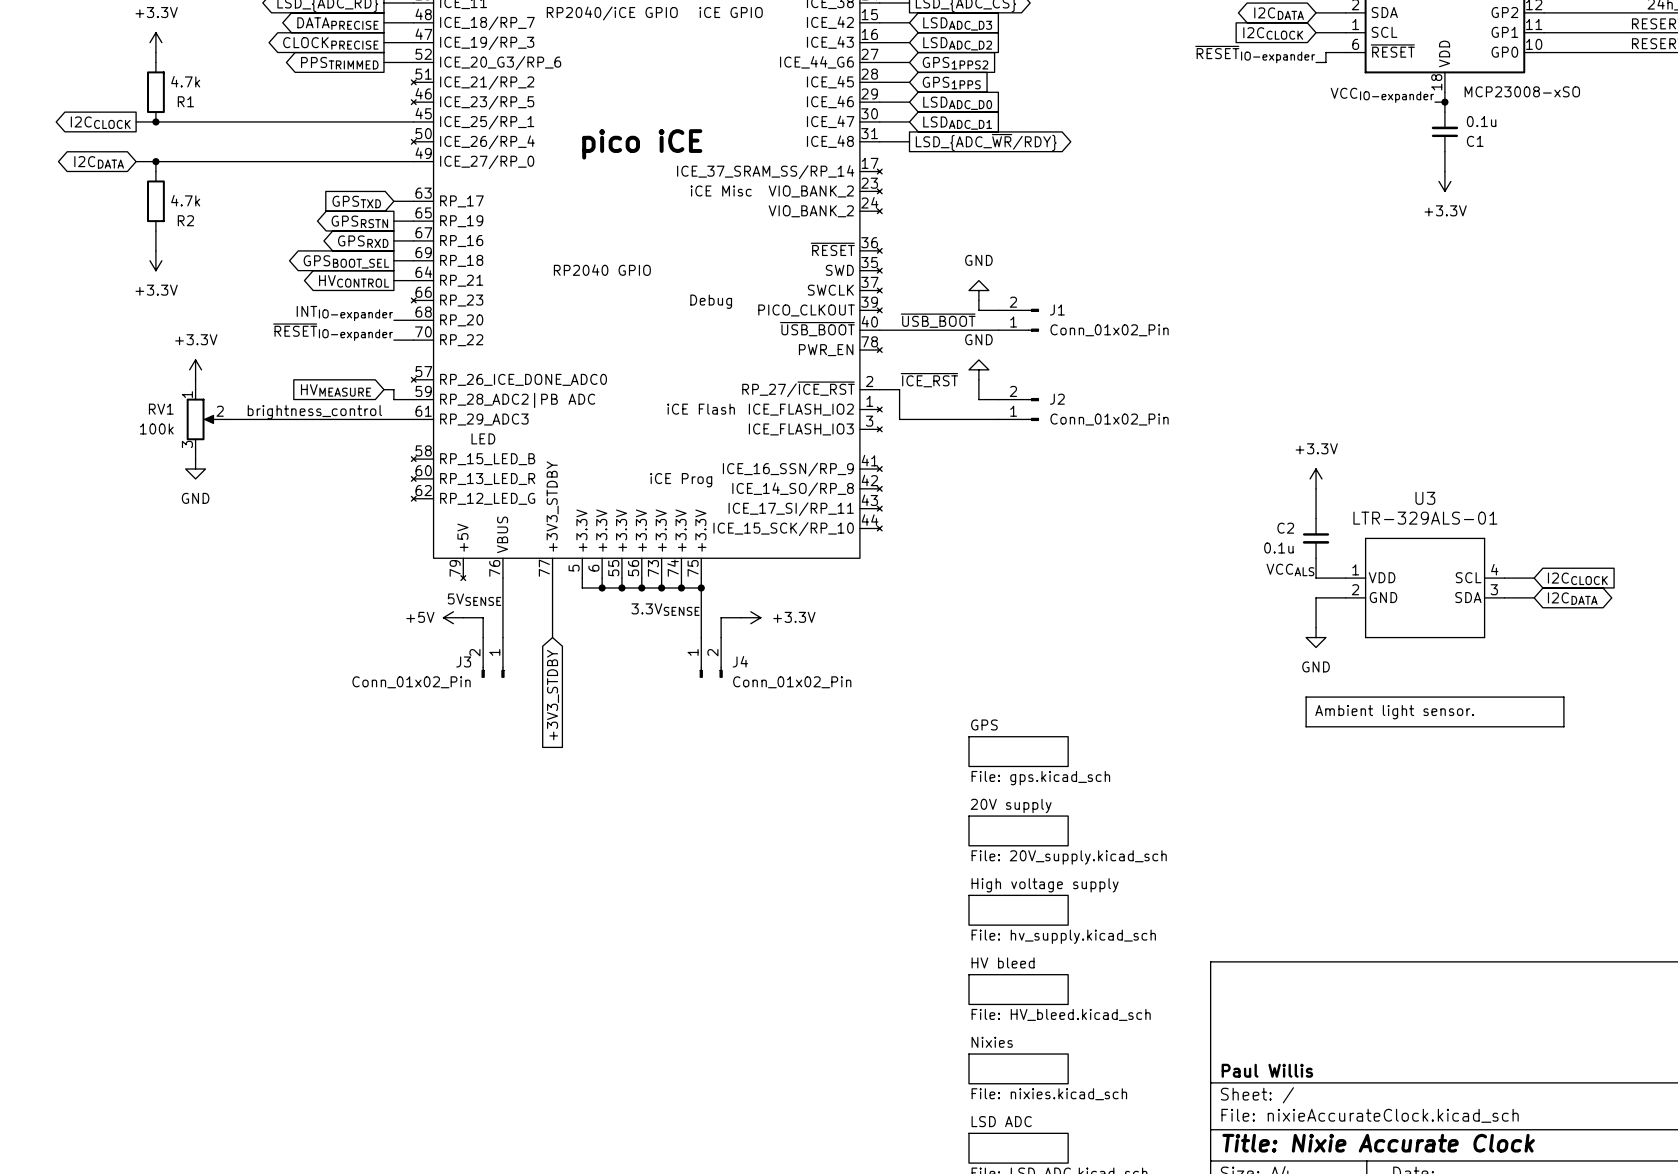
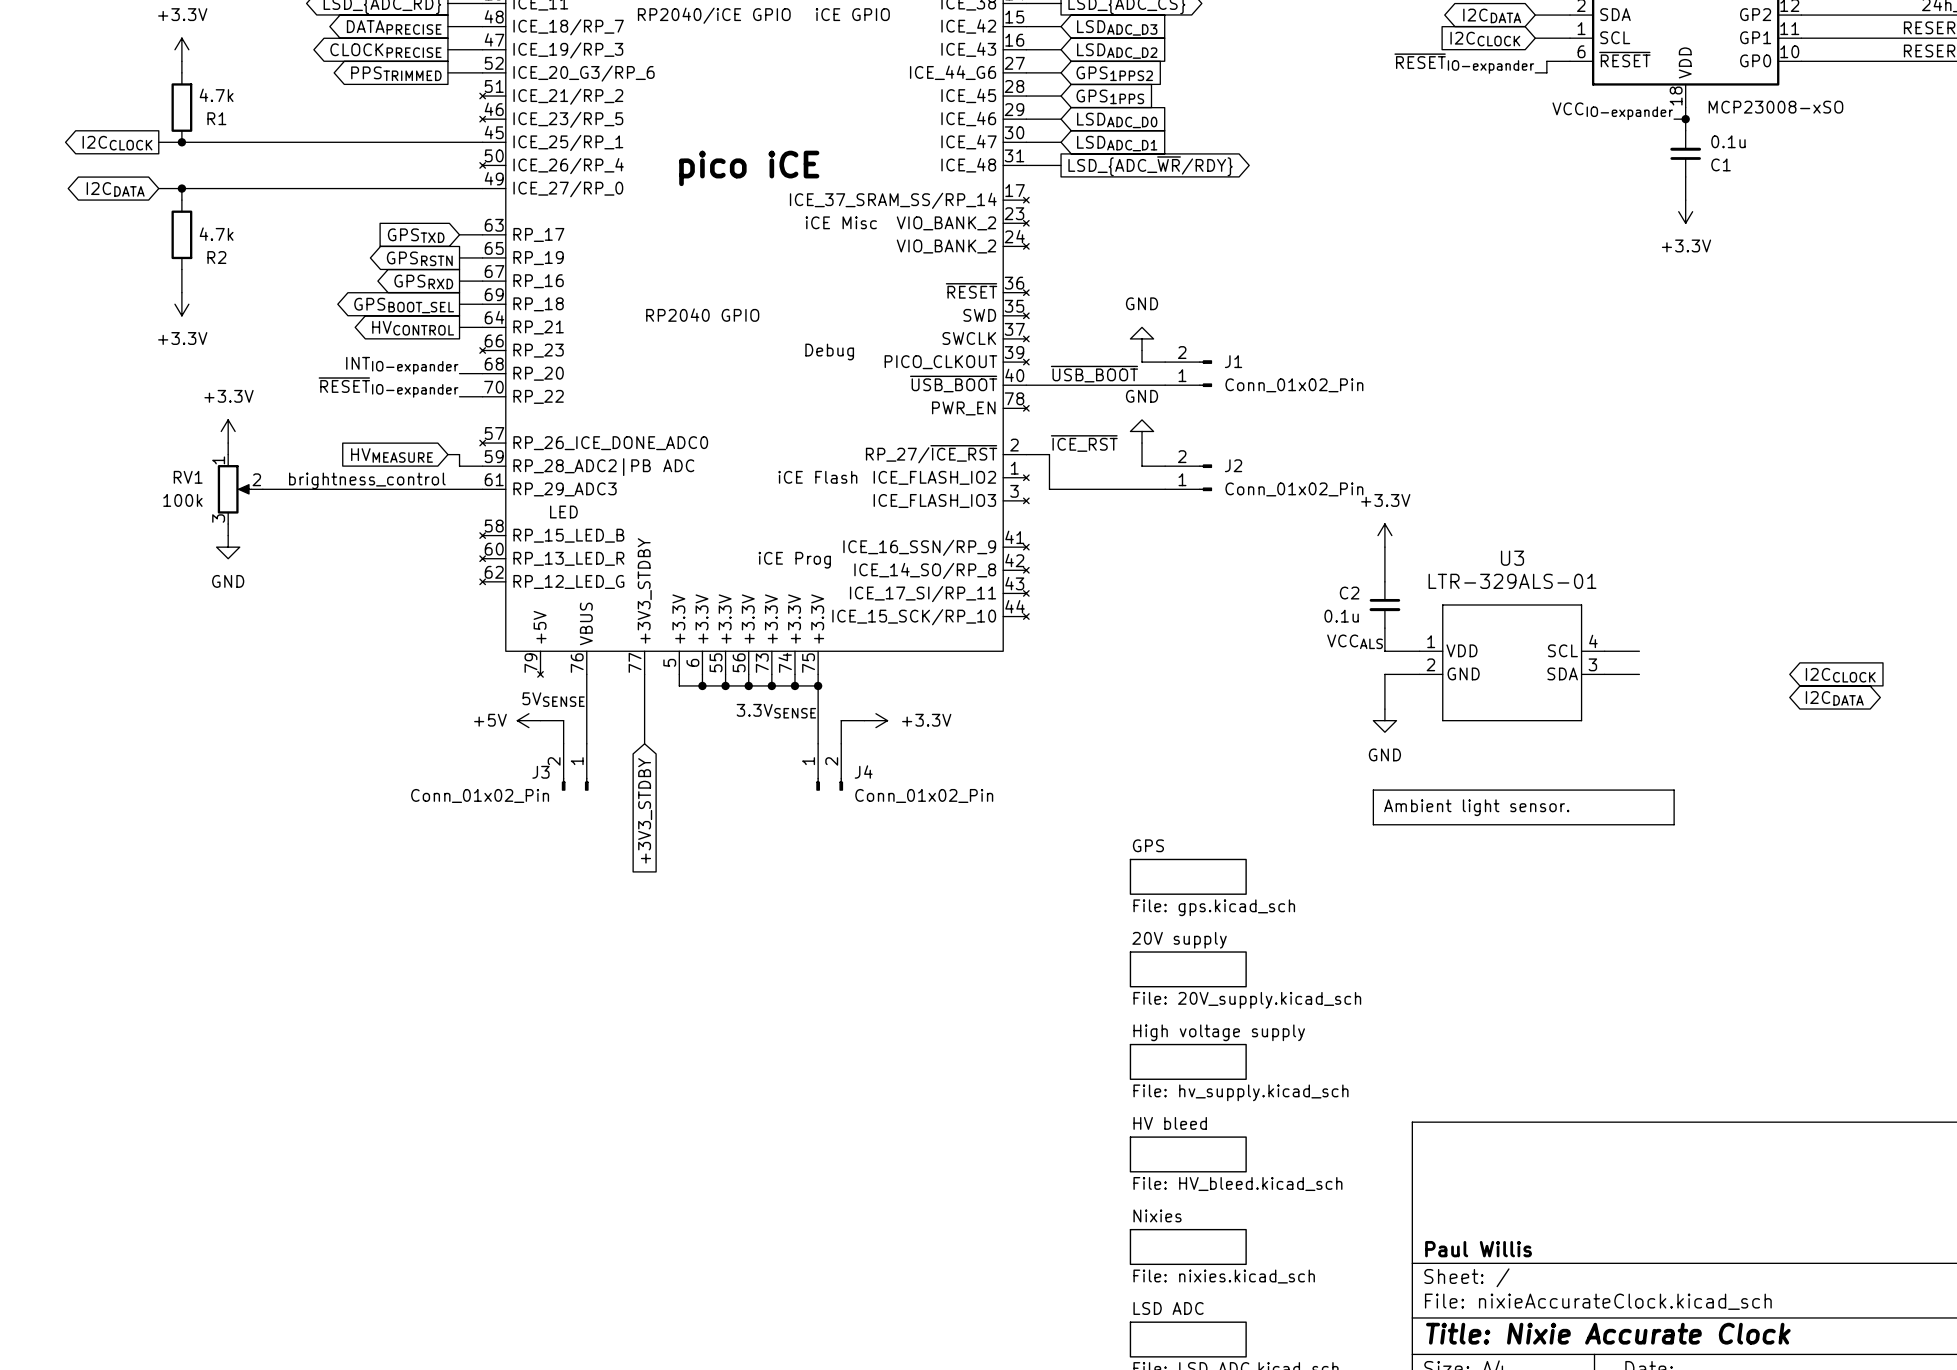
power symbol position: +3.3V (1316, 478) -> +3.3V (1384, 535)
wire: (1316, 488) (1316, 518) -> (1384, 547) (1384, 581)
C2 position: (1316, 538) -> (1384, 604)
wire: (1316, 558) (1316, 578) (1345, 578) -> (1384, 628) (1384, 651) (1419, 651)
label position: VCCALS (1290, 569) -> VCCALS (1355, 641)
wire: (1504, 578) (1534, 578) -> (1604, 651) (1639, 651)
U3 position: (1425, 587) -> (1512, 662)
wire: (1345, 597) (1316, 597) (1316, 627) -> (1419, 674) (1384, 674) (1384, 709)
wire: (1504, 597) (1534, 597) -> (1604, 674) (1639, 674)
power symbol position: GND (1316, 637) -> GND (1384, 720)
line: (1306, 697) (1563, 697) (1563, 726) (1306, 726) (1306, 697) -> (1373, 790) (1674, 790) (1674, 824) (1373, 824) (1373, 790)
text position: Ambient light sensor. (1394, 712) -> Ambient light sensor. (1476, 807)

